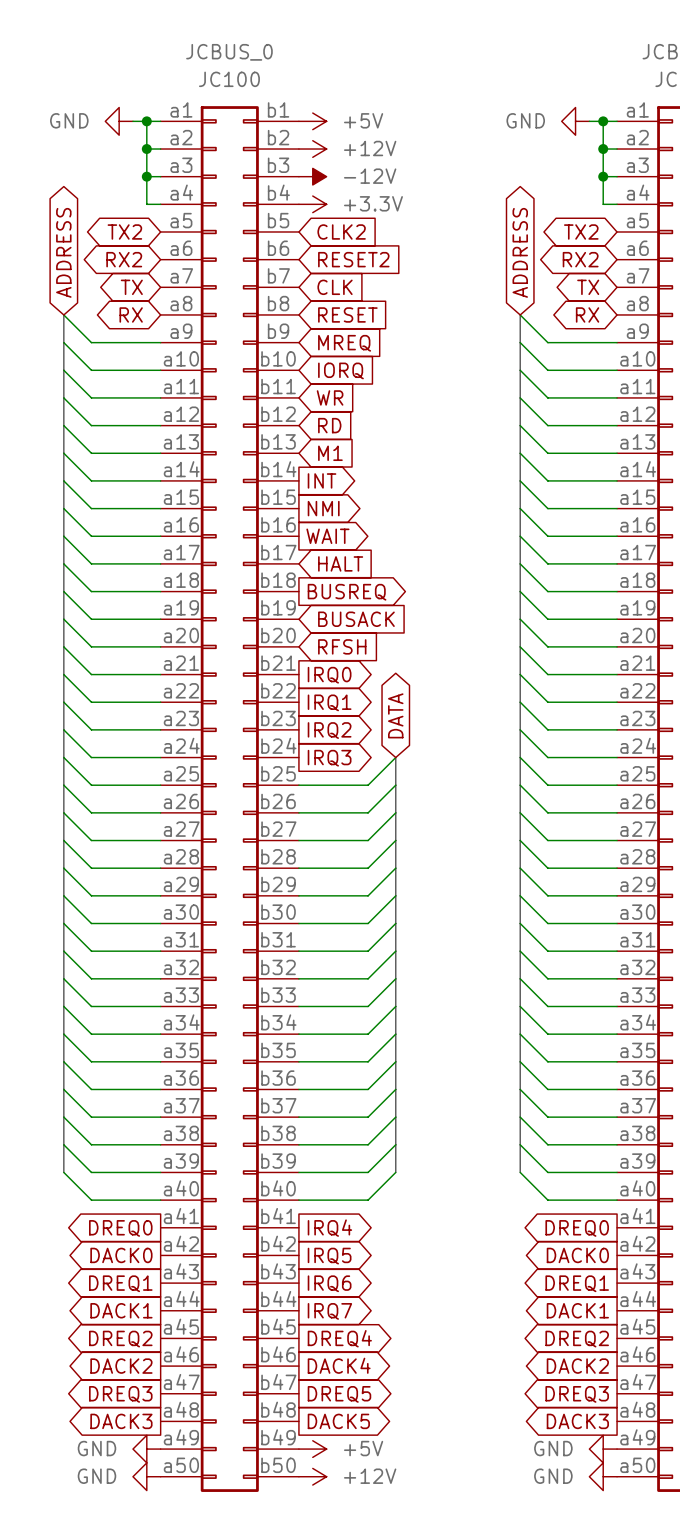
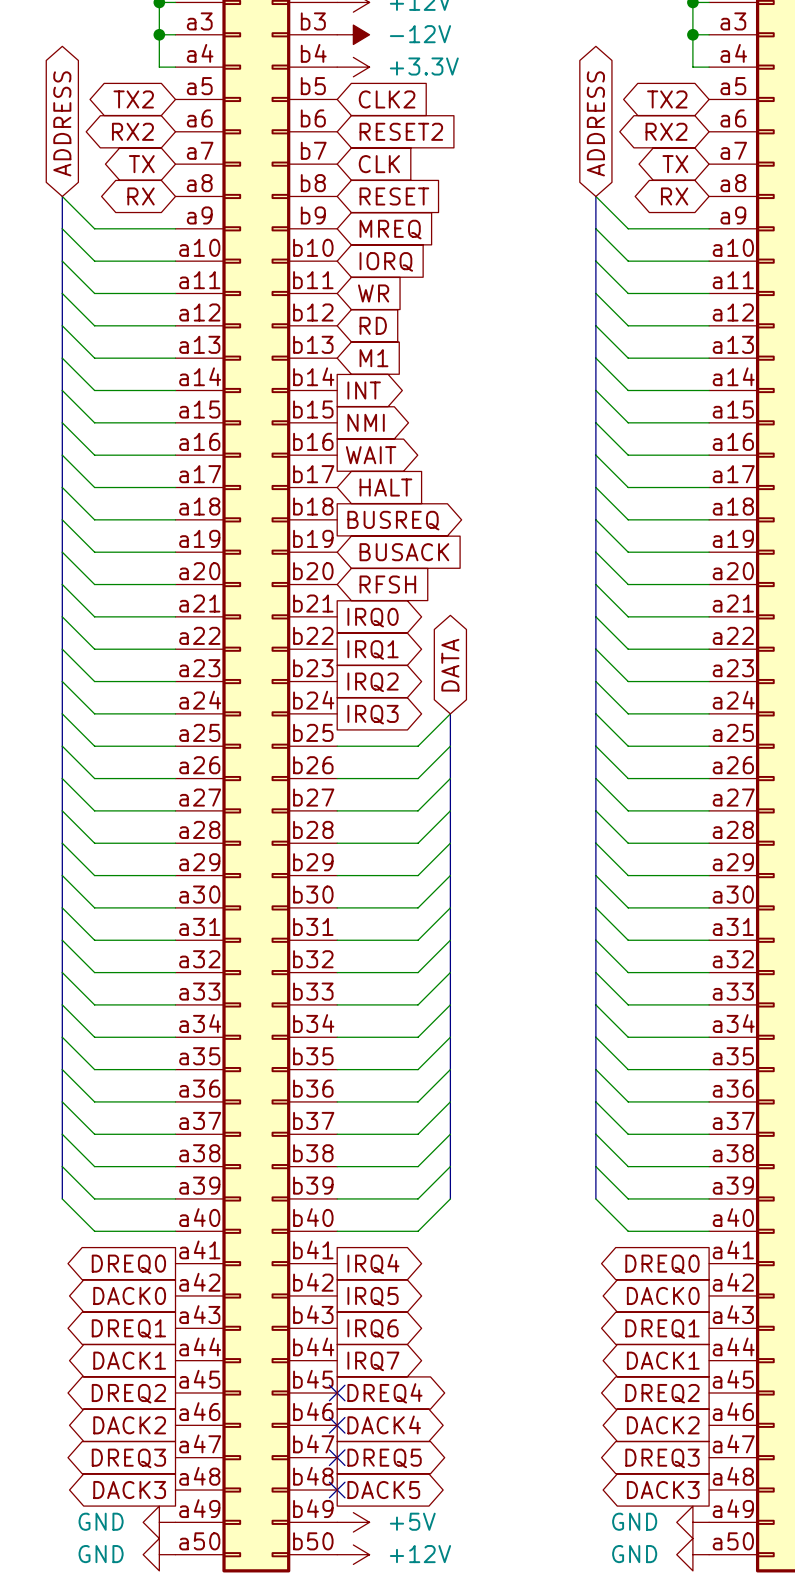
no-connect mark: none -> (337, 1392)
no-connect mark: none -> (337, 1425)
no-connect mark: none -> (337, 1457)
no-connect mark: none -> (337, 1490)

